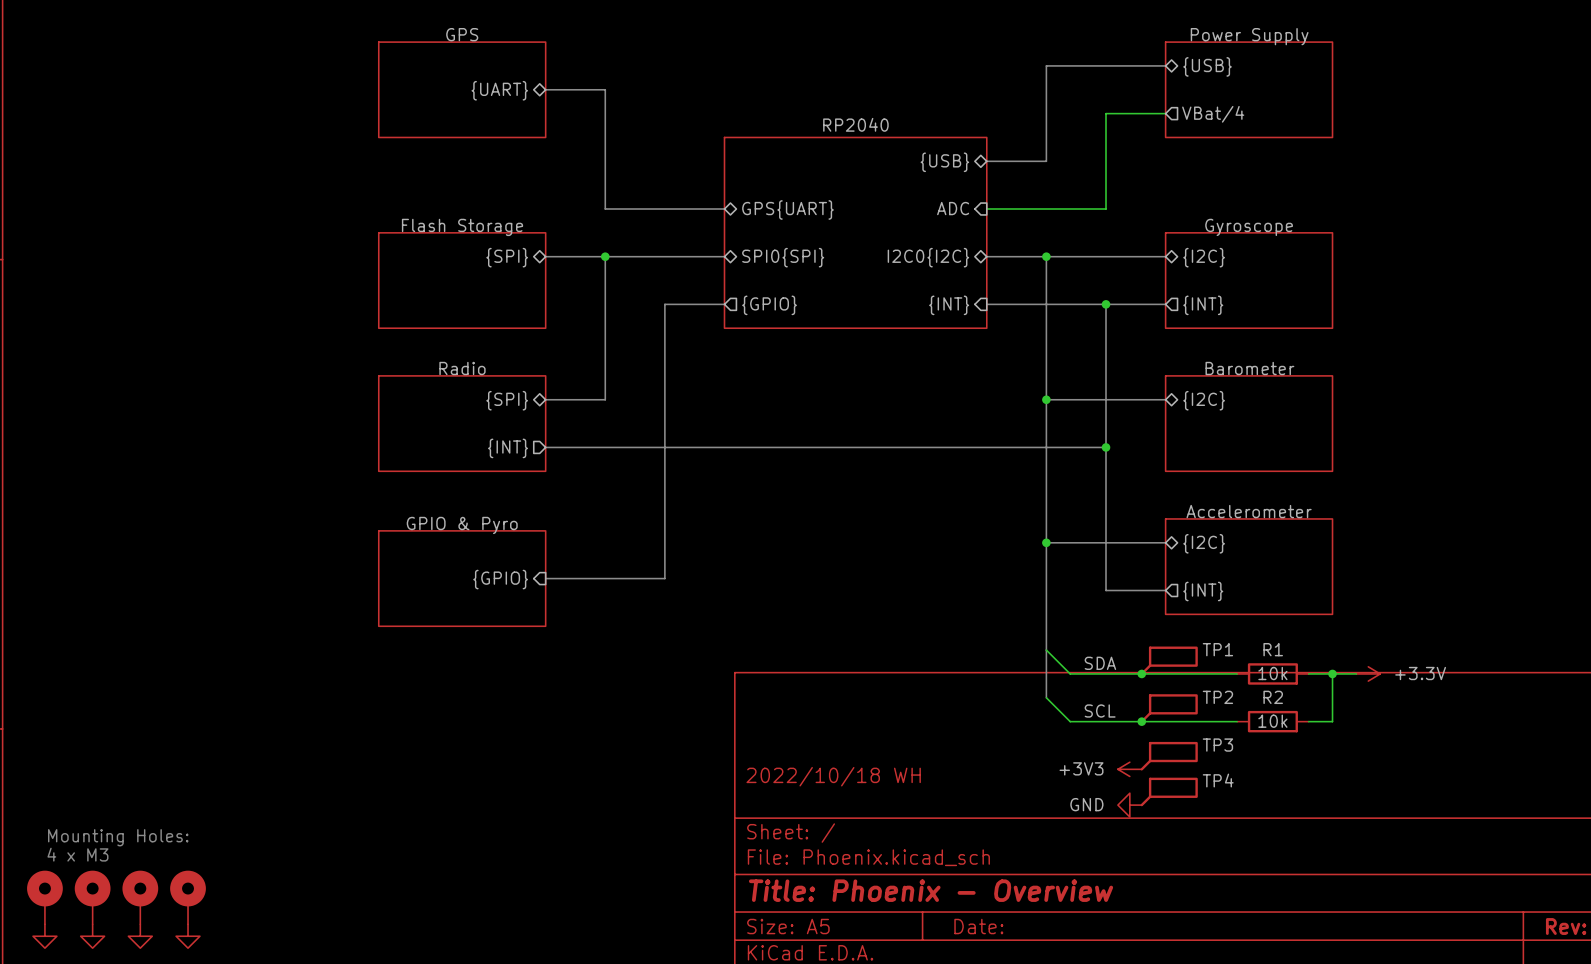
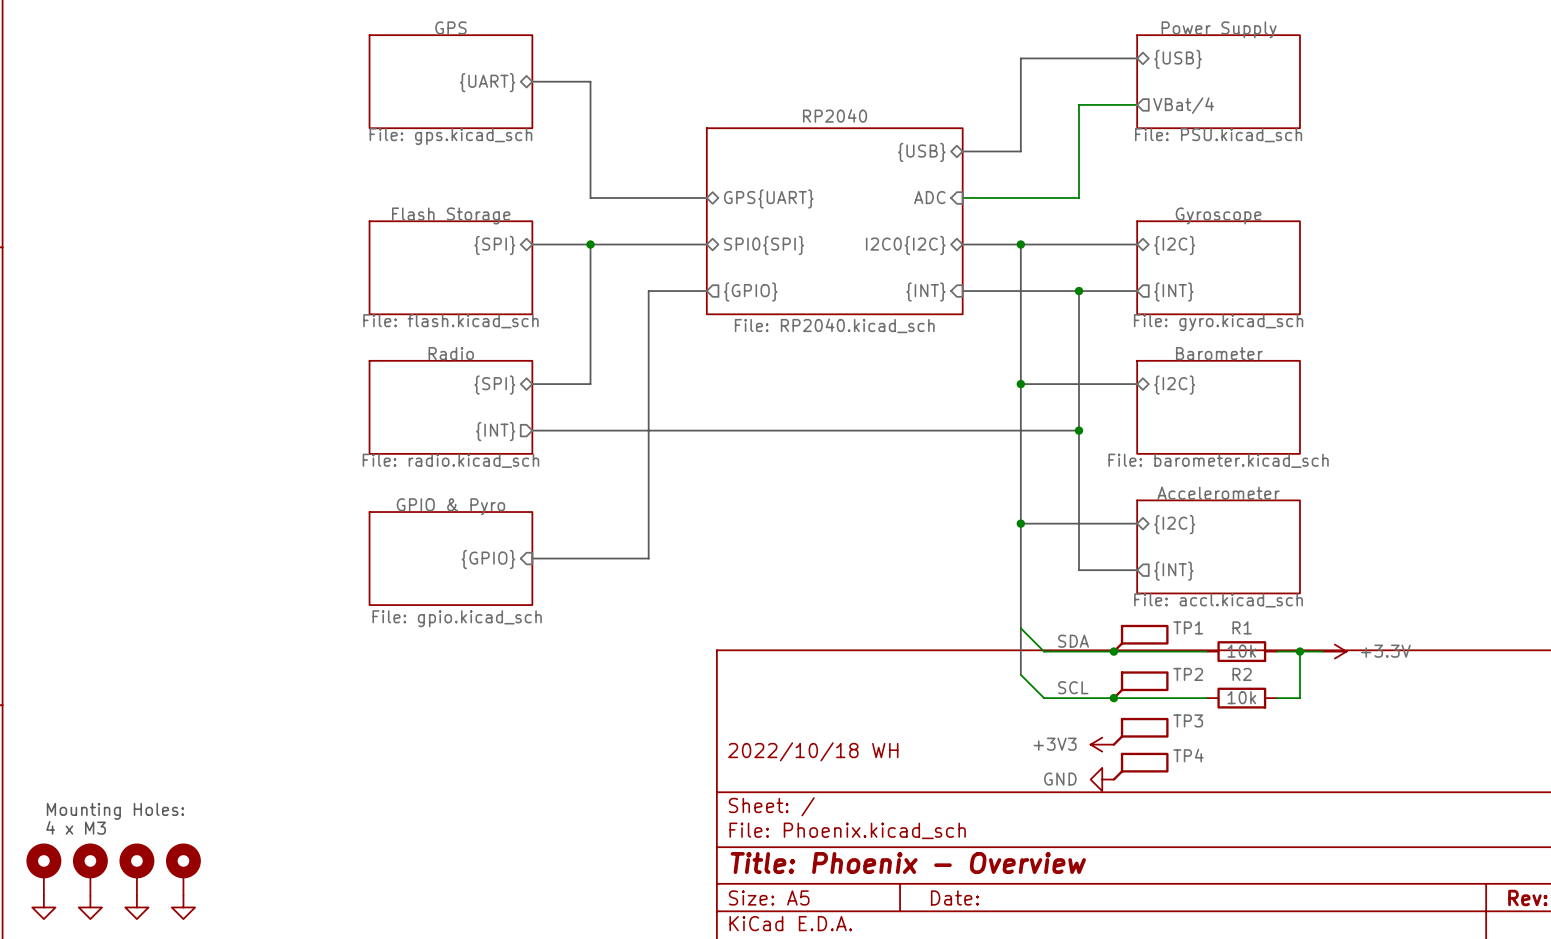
sheet Power Supply value: none -> File: PSU.kicad_sch (1218, 135)
sheet GPS value: none -> File: gps.kicad_sch (450, 136)
sheet Flash Storage value: none -> File: flash.kicad_sch (450, 321)
sheet Gyroscope value: none -> File: gyro.kicad_sch (1218, 322)
sheet RP2040 value: none -> File: RP2040.kicad_sch (834, 325)
sheet Radio value: none -> File: radio.kicad_sch (450, 460)
sheet Barometer value: none -> File: barometer.kicad_sch (1218, 460)
sheet Accelerometer value: none -> File: accl.kicad_sch (1218, 600)
sheet GPIO & Pyro value: none -> File: gpio.kicad_sch (457, 618)

